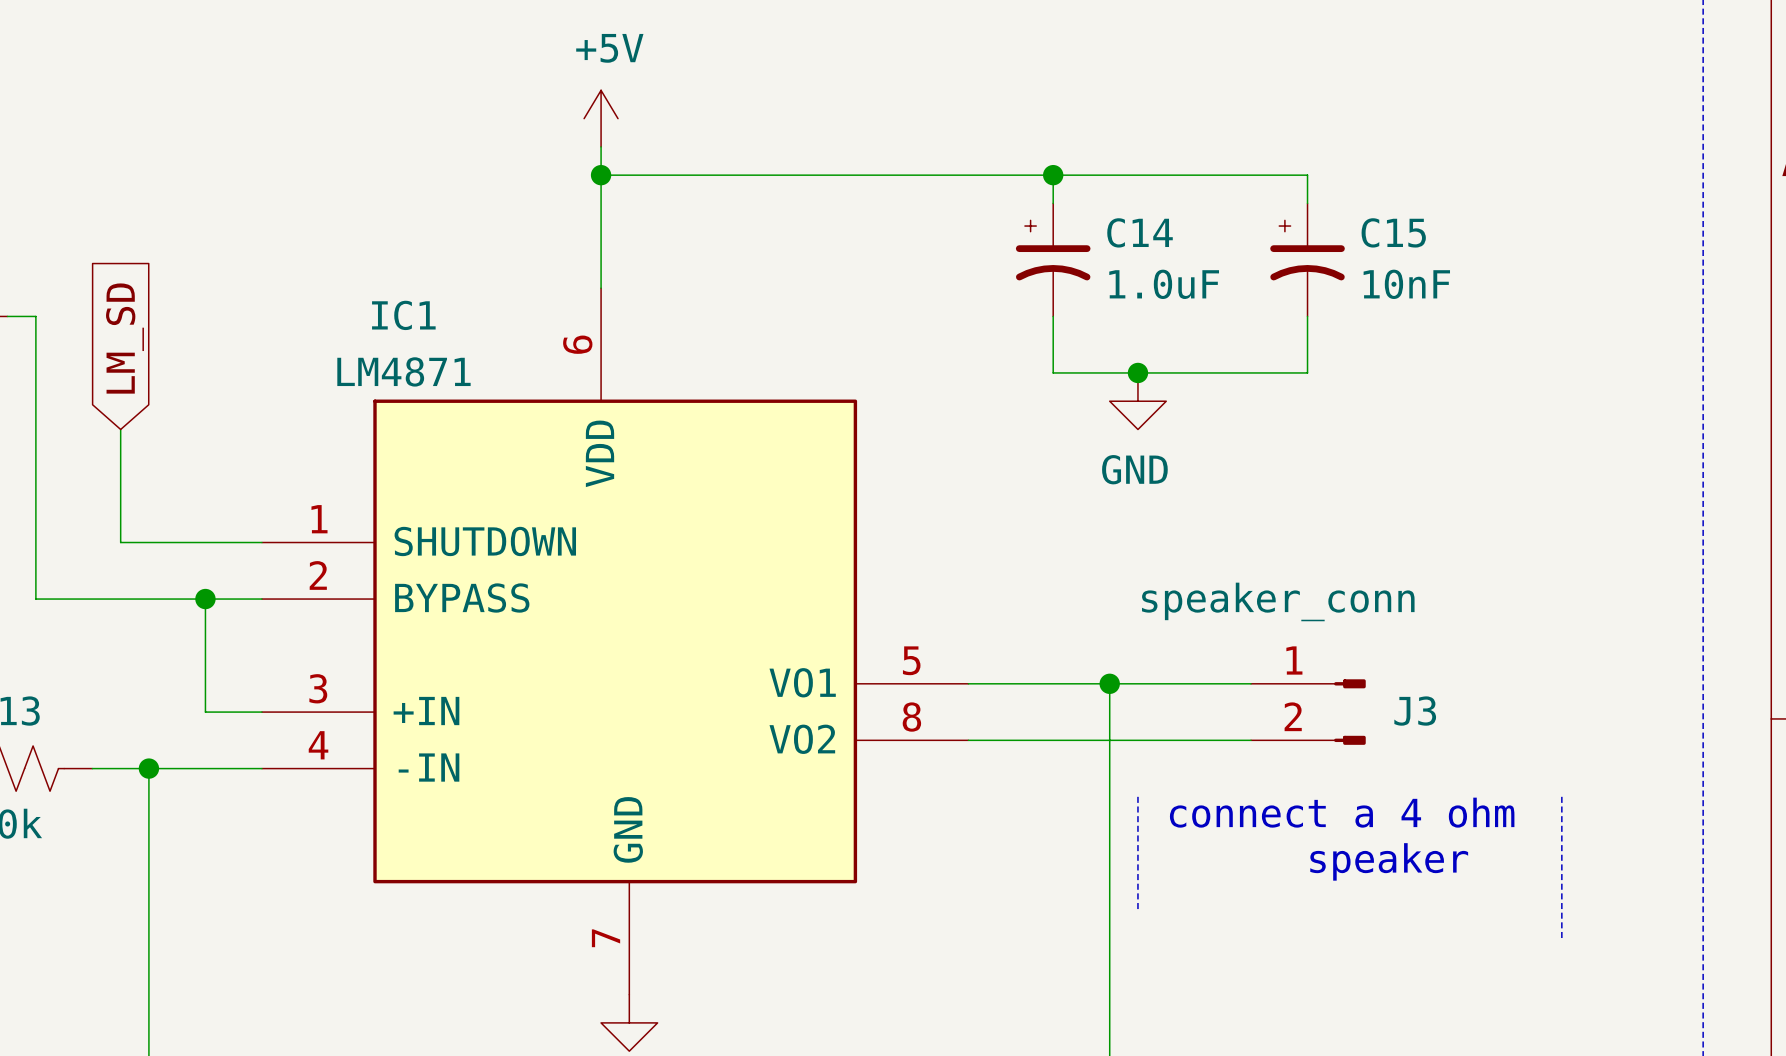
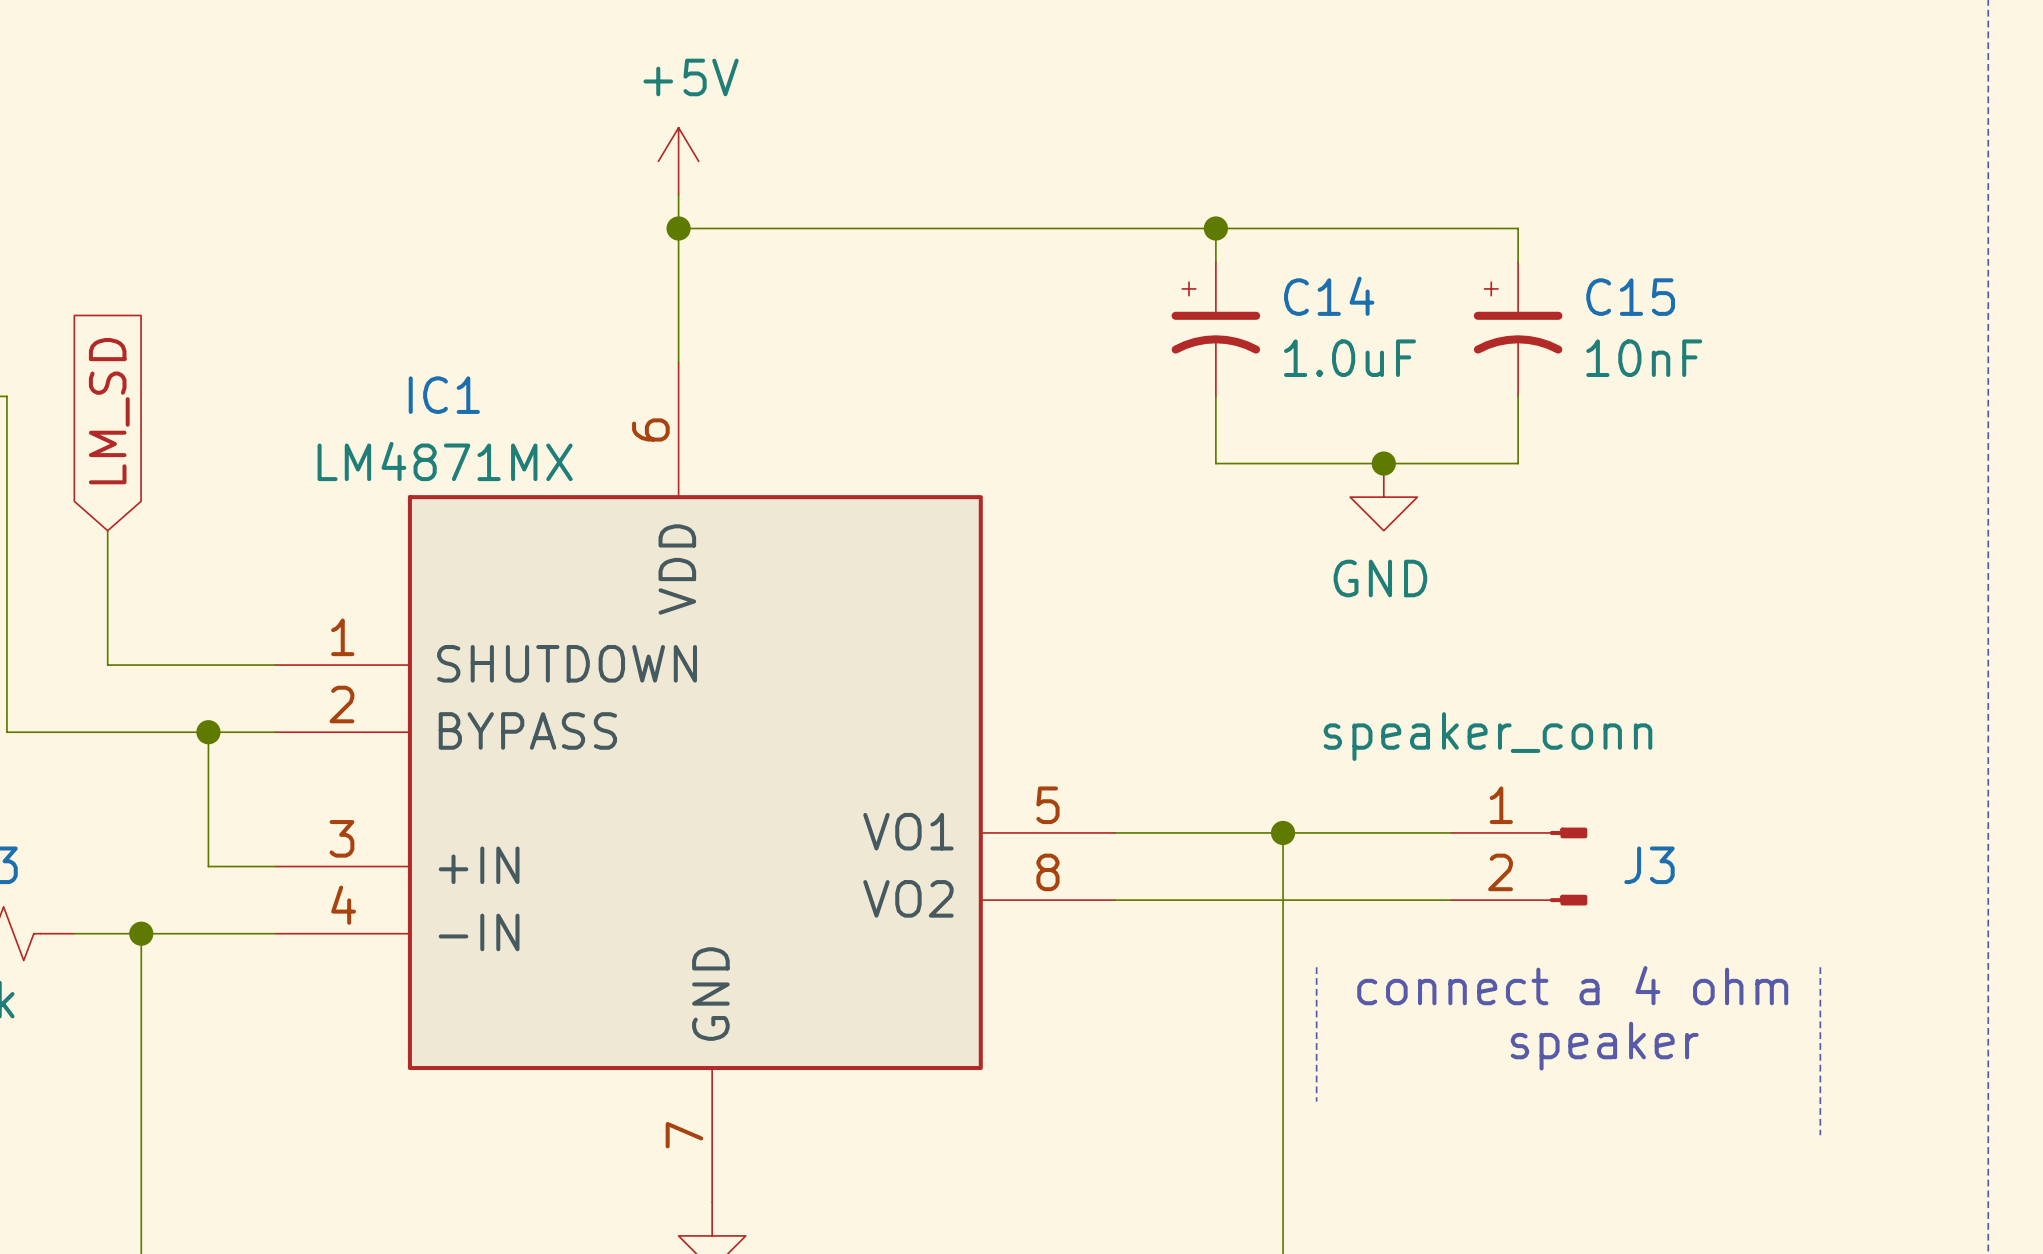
IC1 value: LM4871 (403, 371) -> LM4871MX (445, 461)
junction position: (1137, 372) -> (1383, 463)
power symbol position: GND (1137, 401) -> GND (1383, 497)

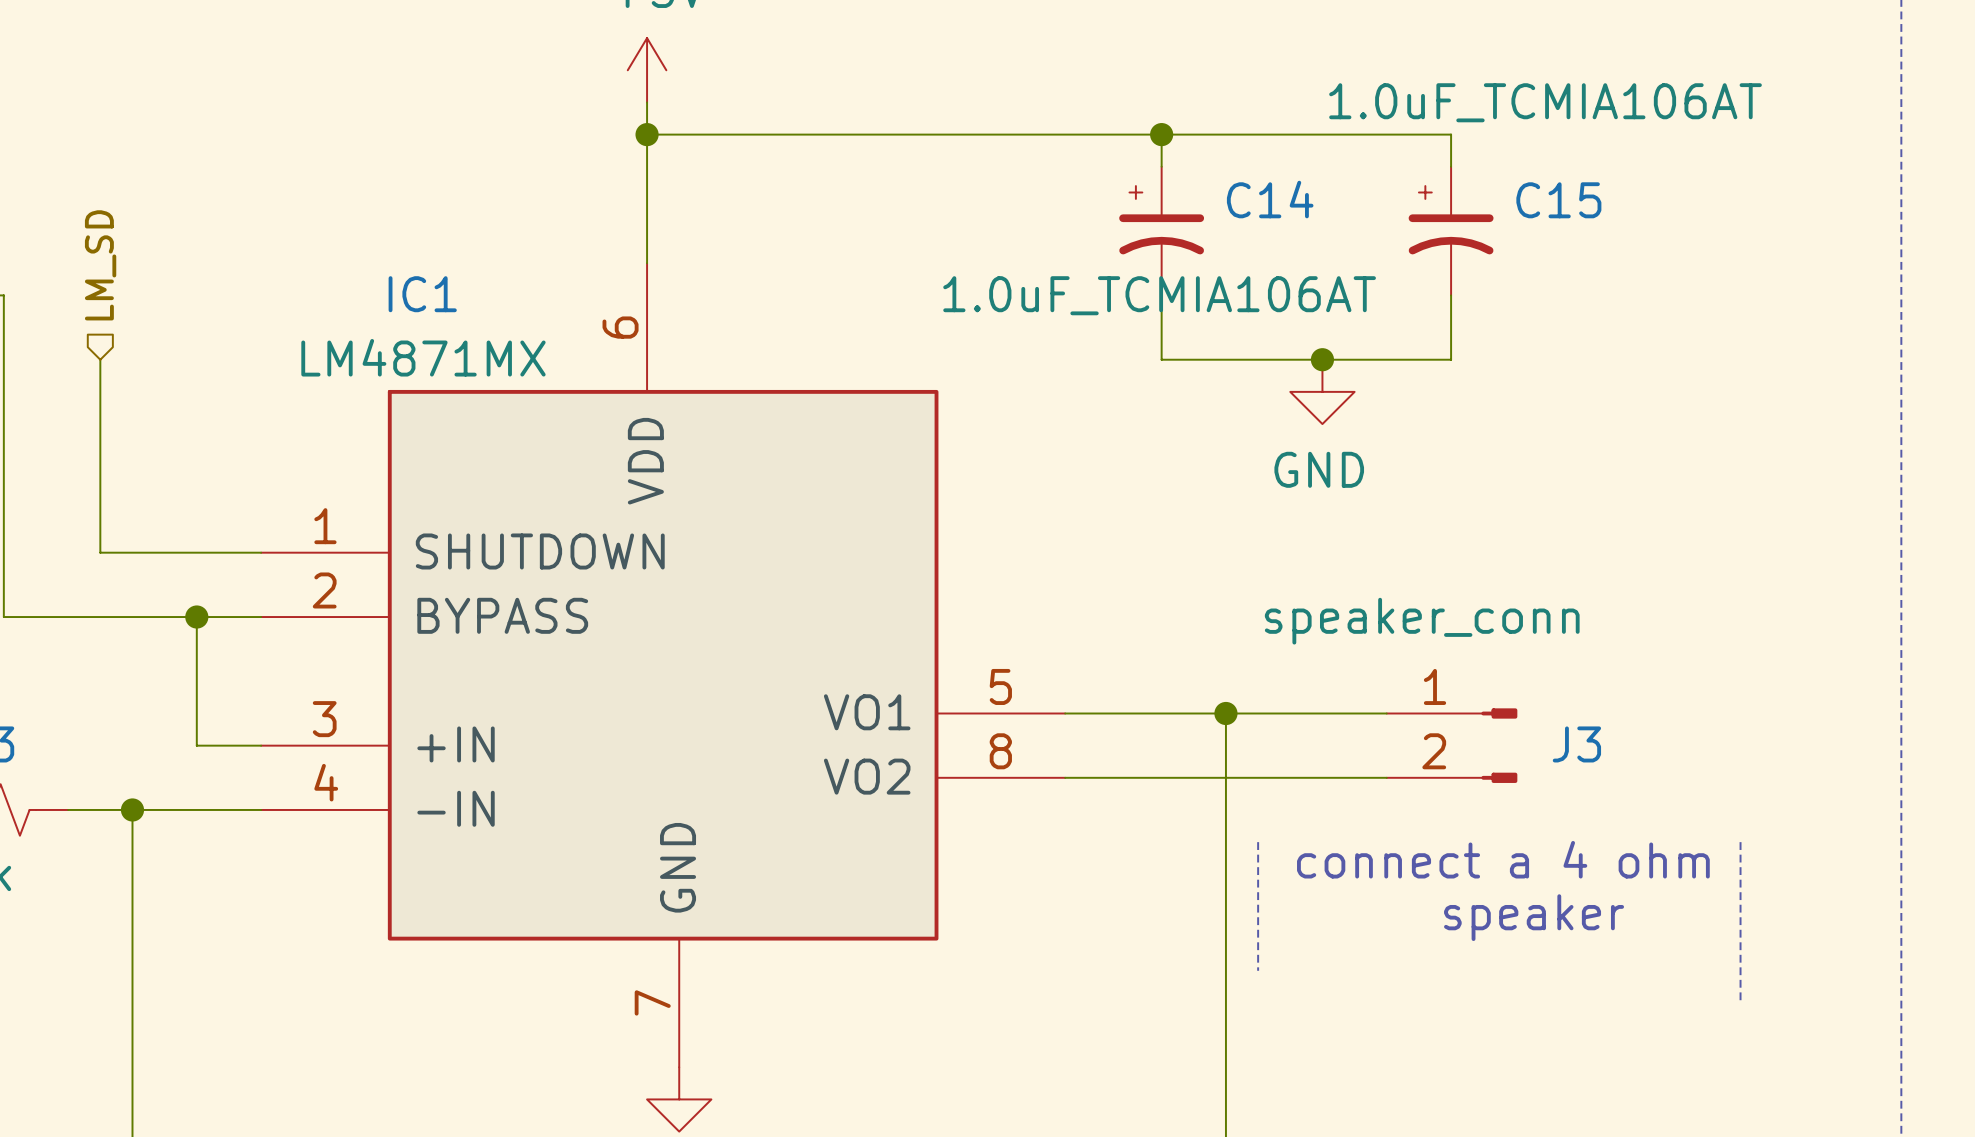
C14 value: 1.0uF (1350, 358) -> 1.0uF_TCMIA106AT (1159, 295)
C15 value: 10nF (1644, 358) -> 1.0uF_TCMIA106AT (1545, 102)
hierarchical label: none -> LM_SD (100, 265)
global label: LM_SD (109, 411) -> none
wire: none -> (100, 359) (100, 424)

